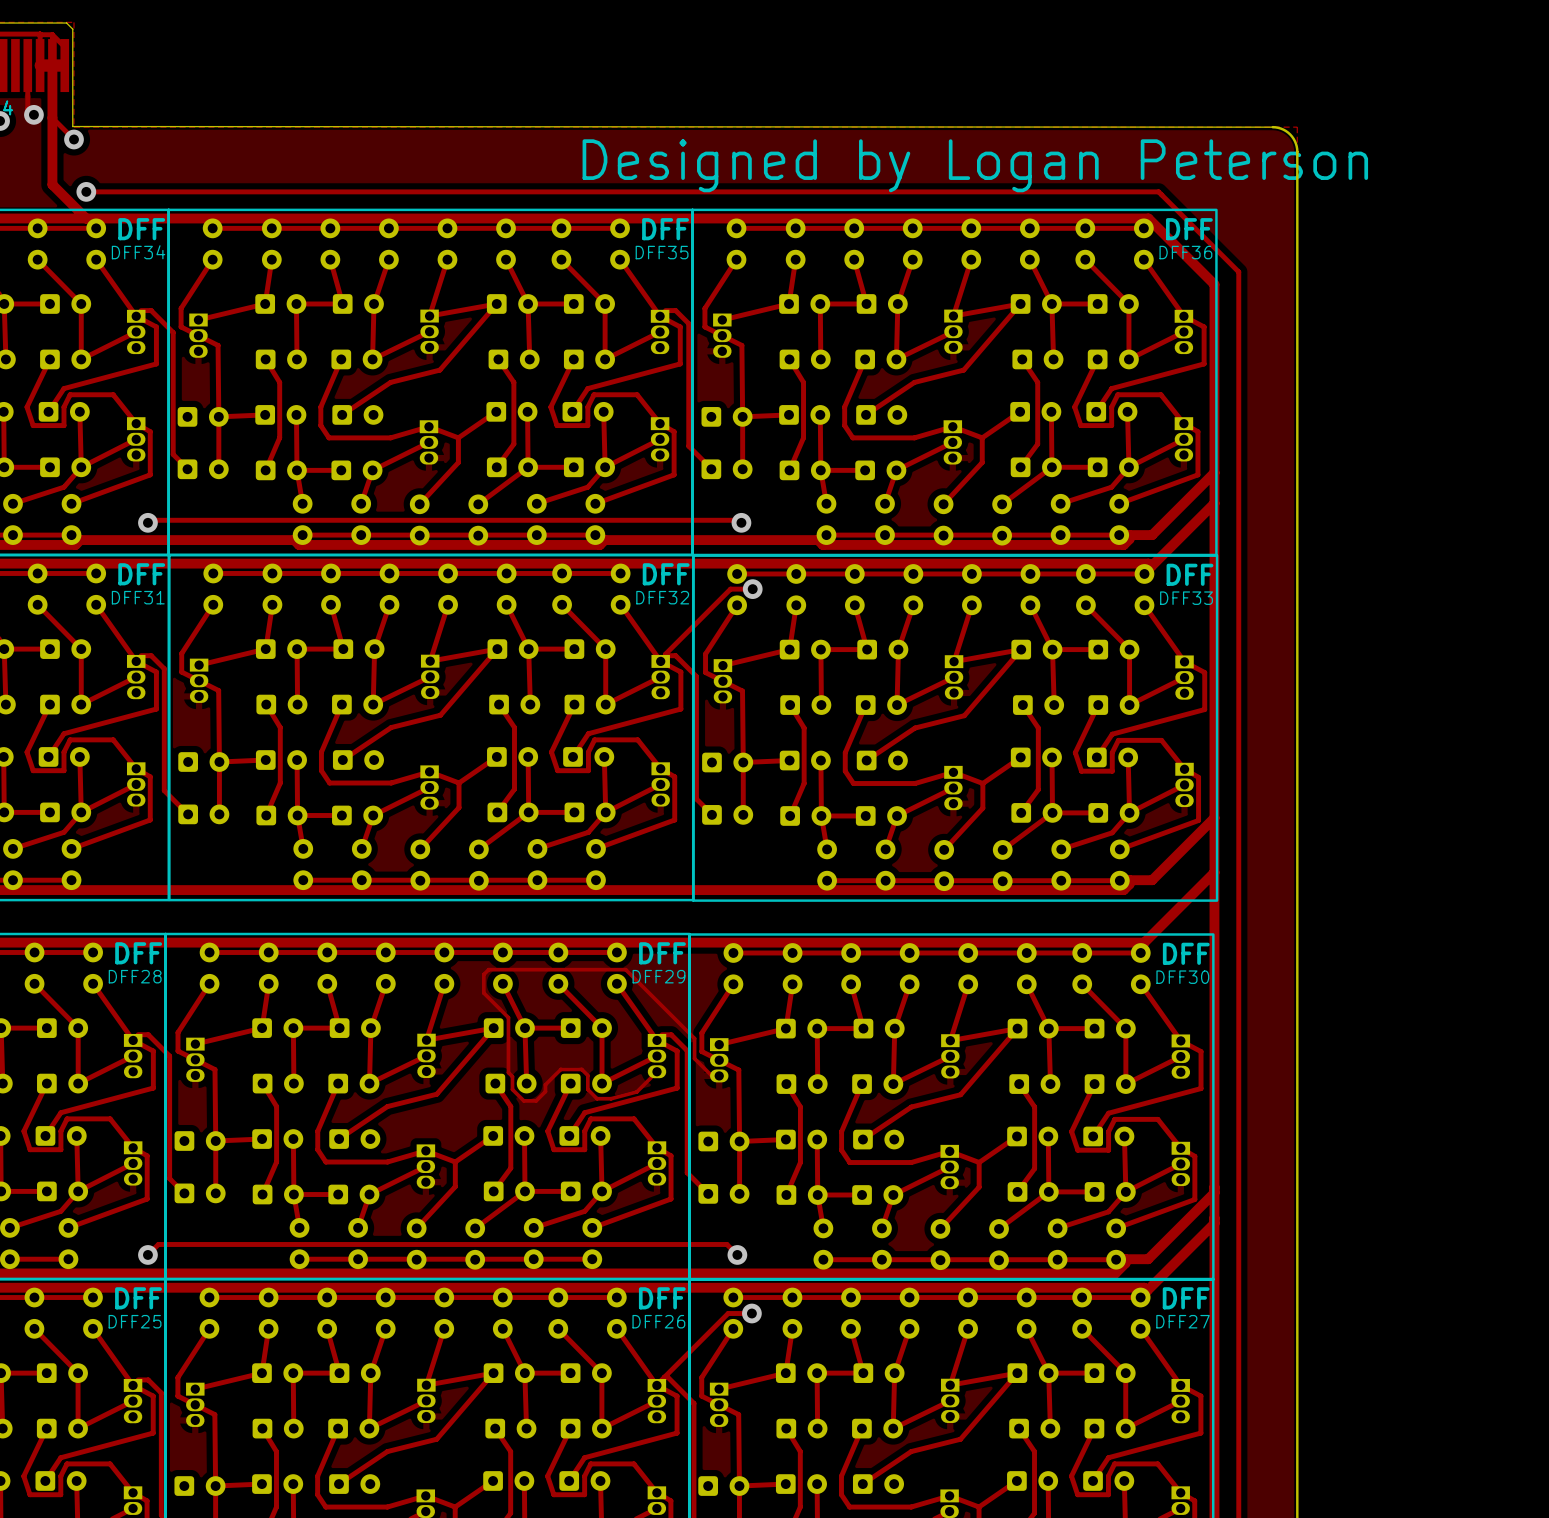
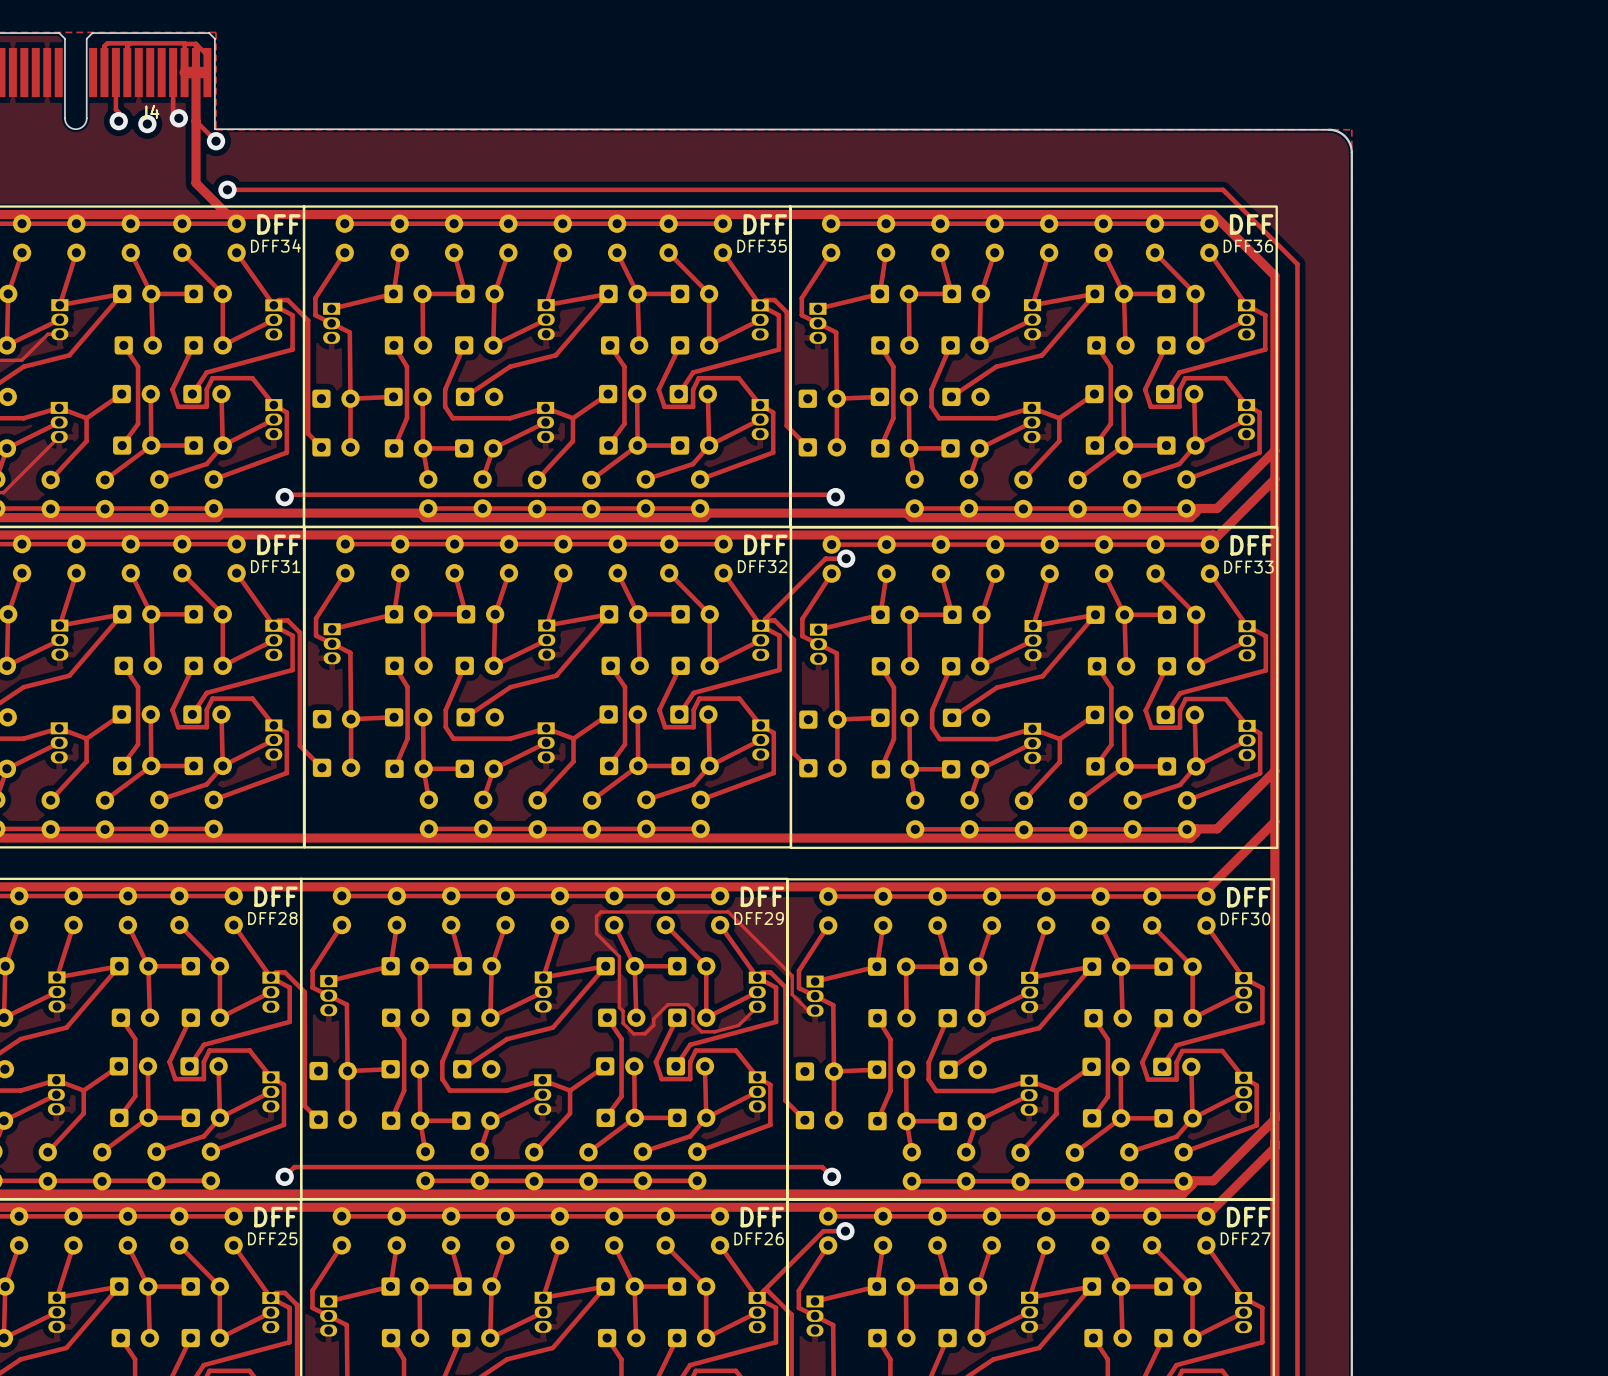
text: Designed by Logan Peterson (975, 165) -> none

